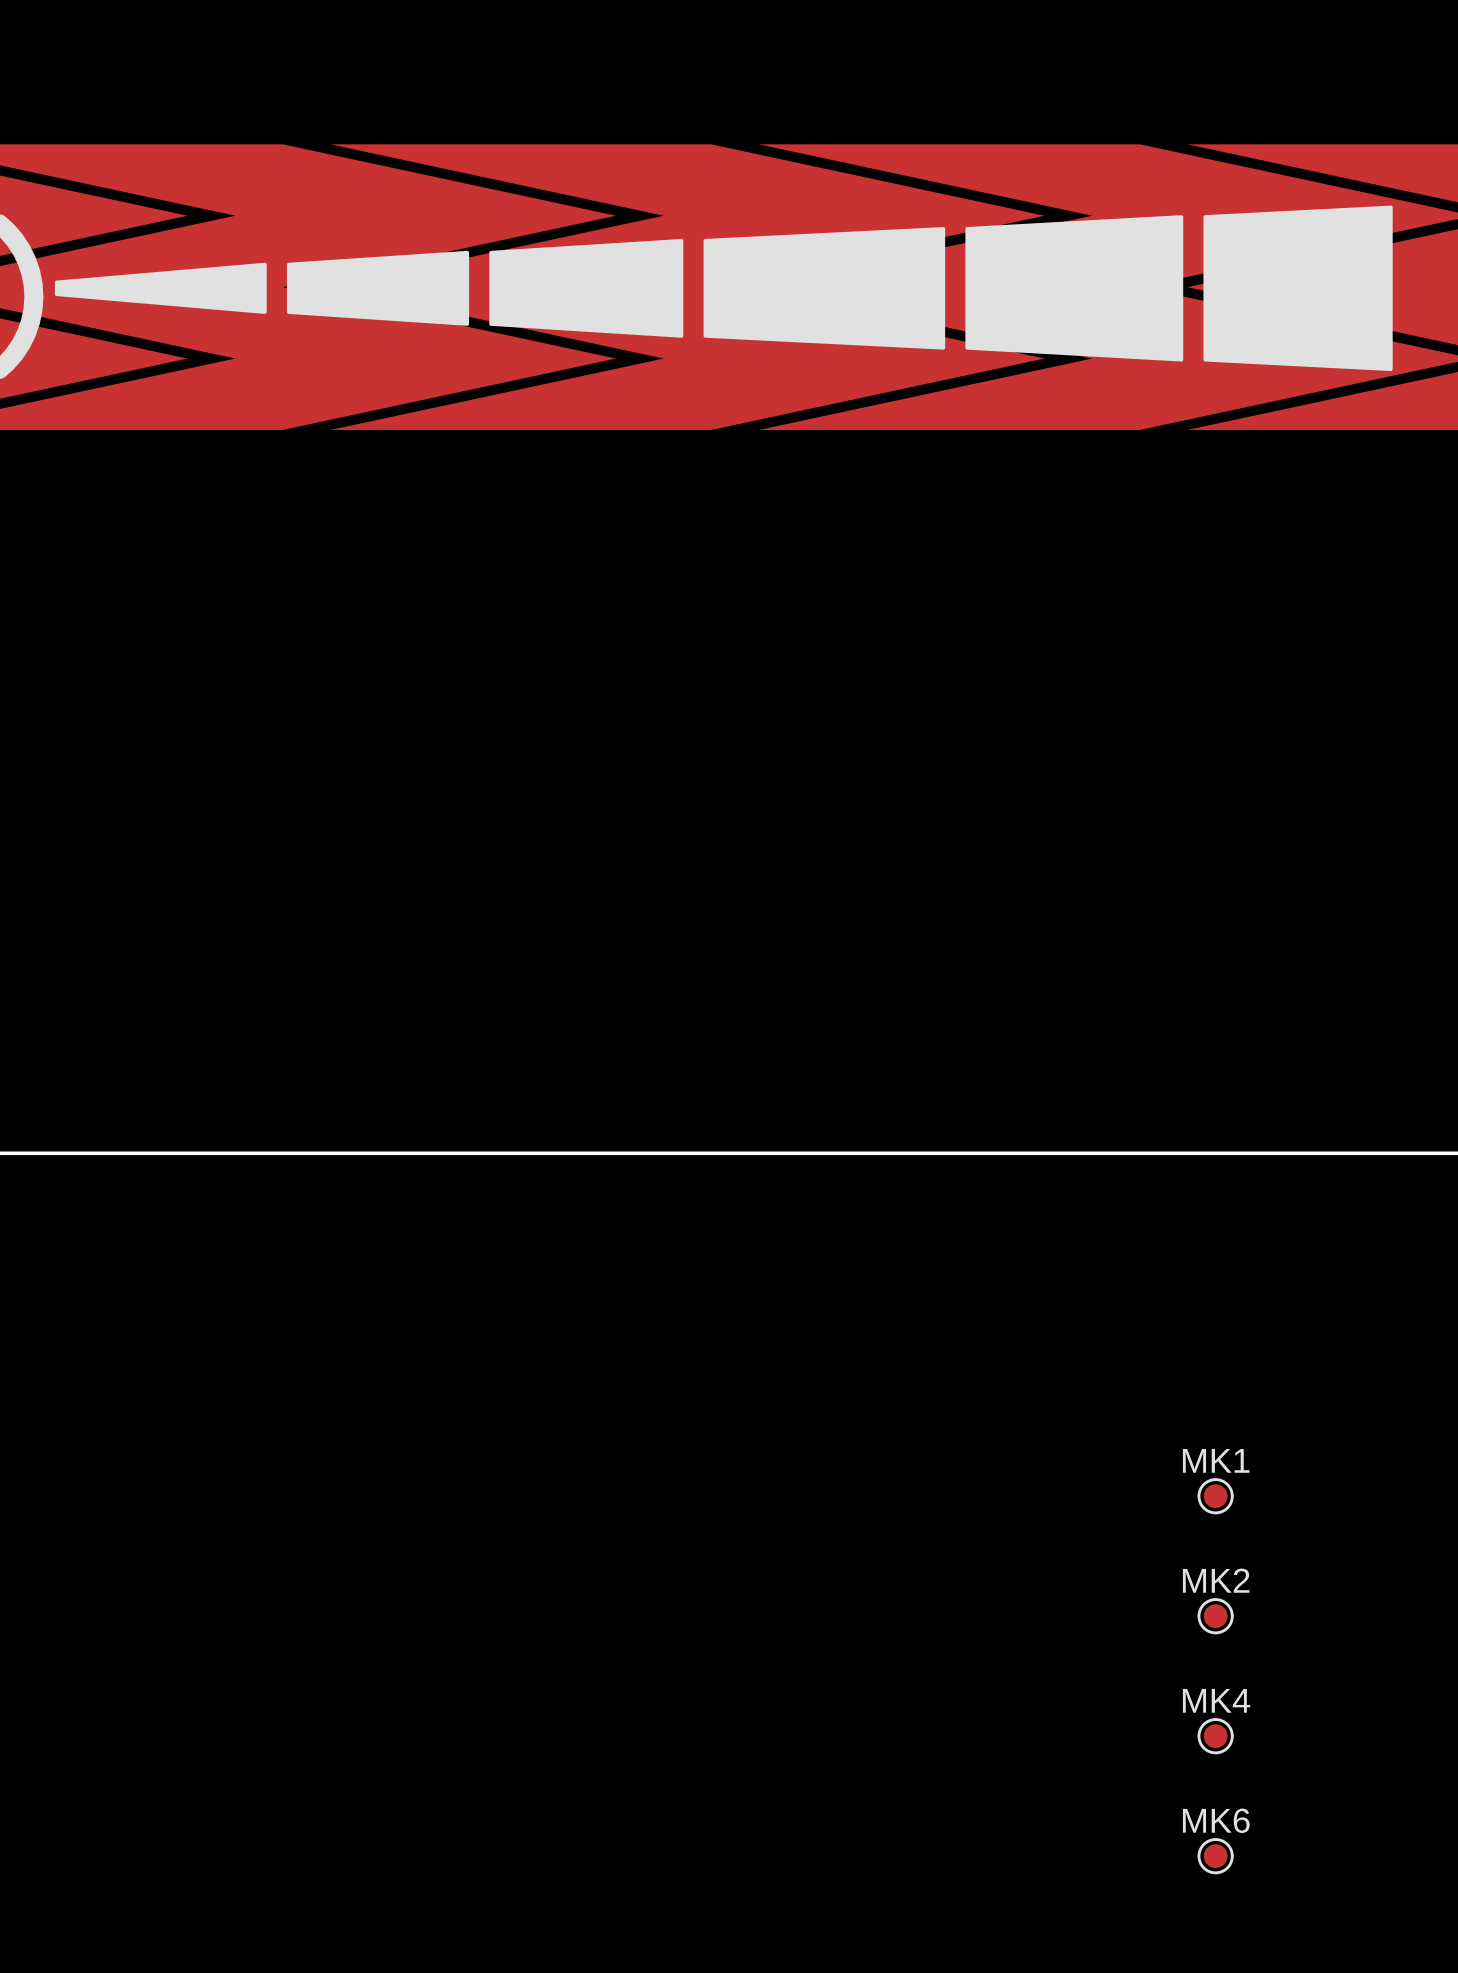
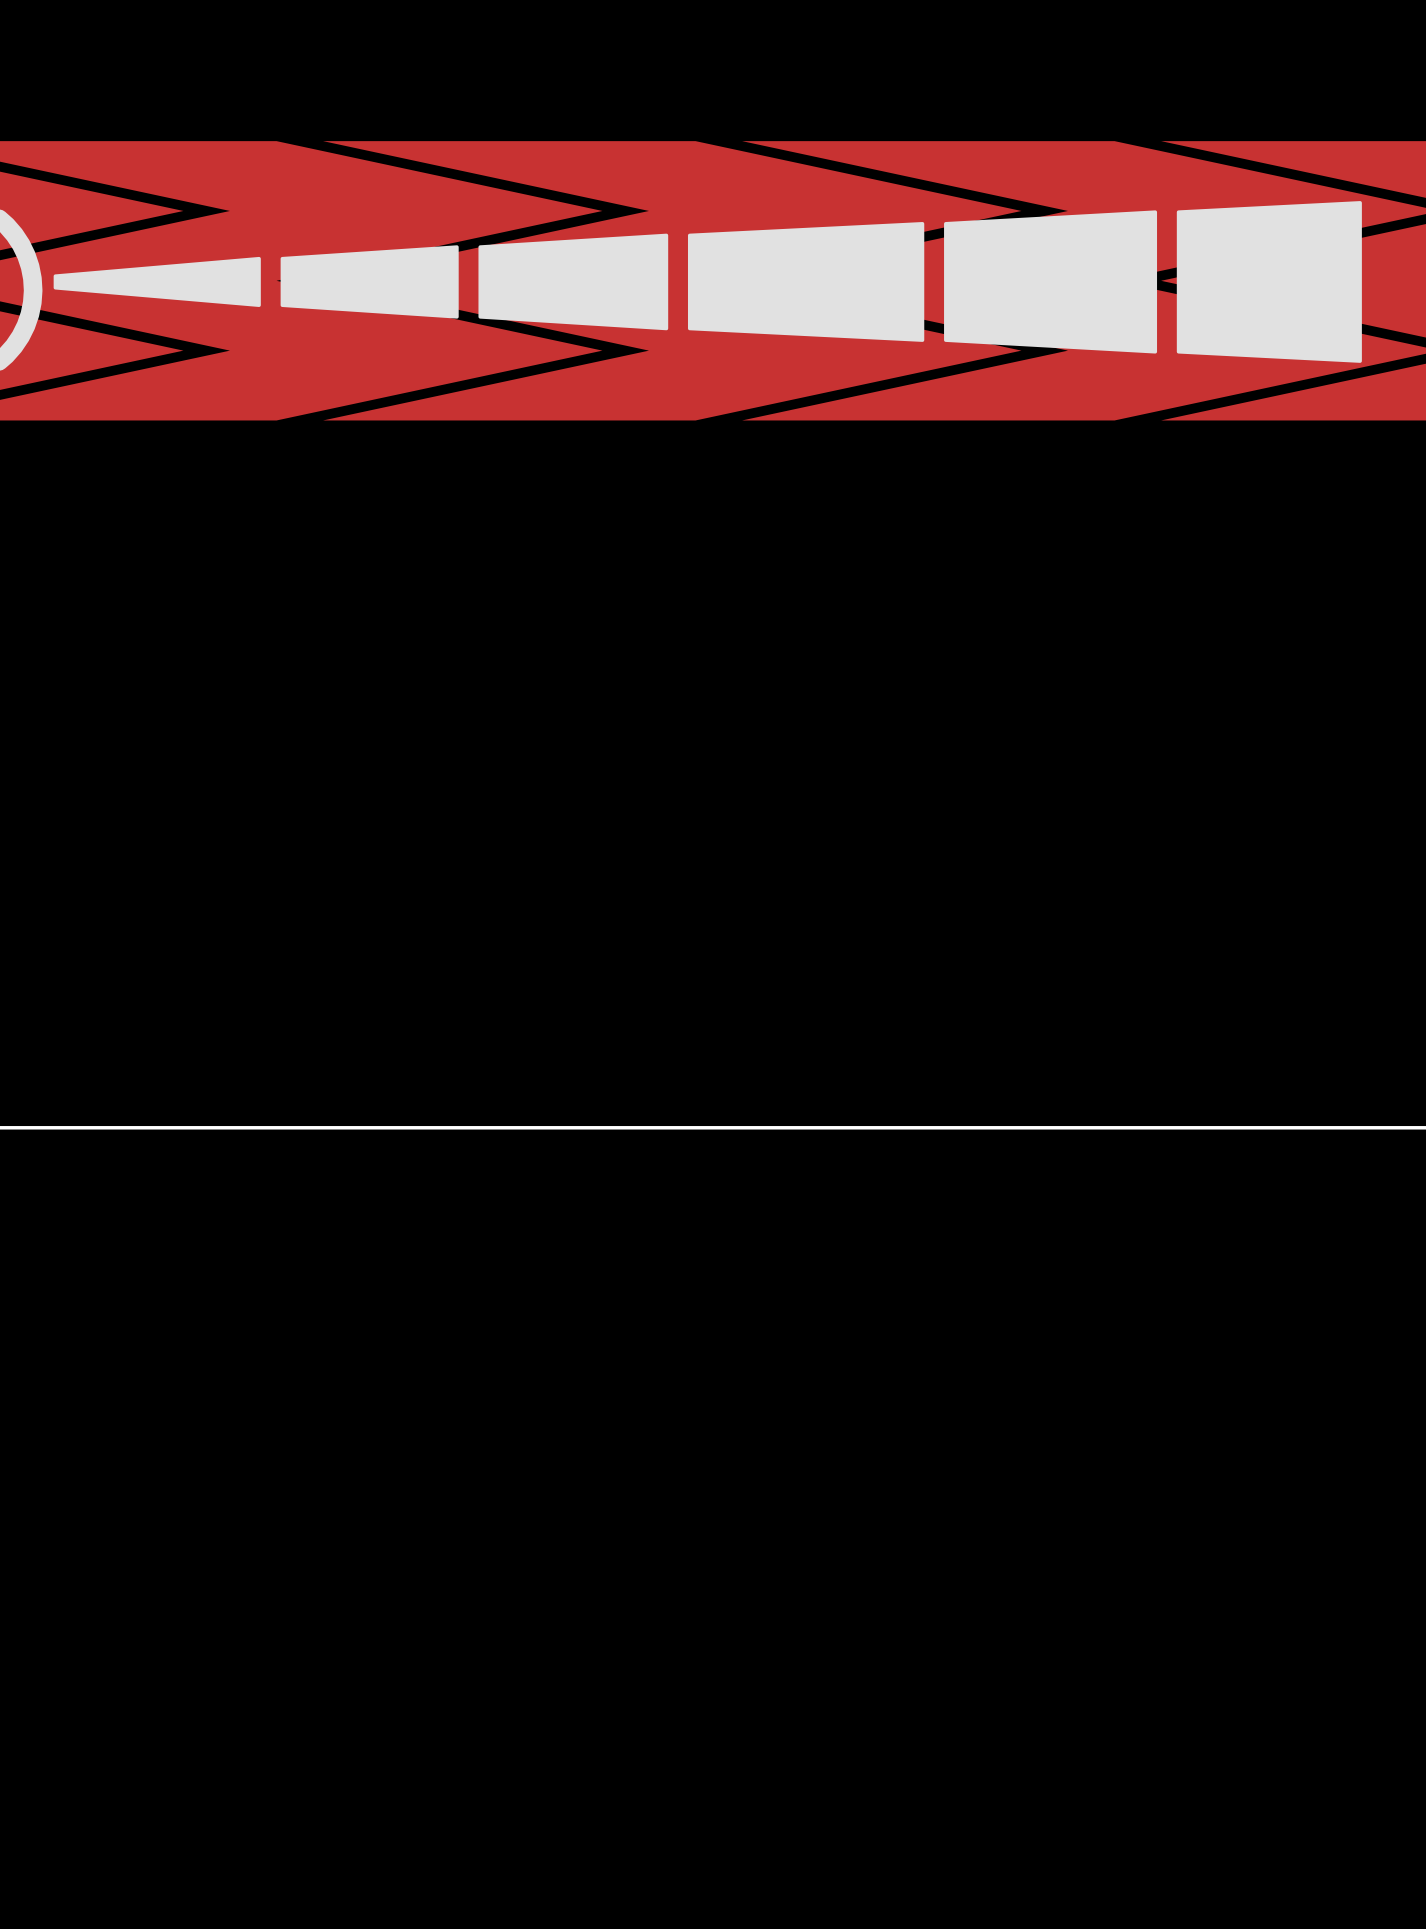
MK1: (1215, 1496) -> none
MK2: (1215, 1616) -> none
MK4: (1215, 1736) -> none
MK6: (1215, 1856) -> none

